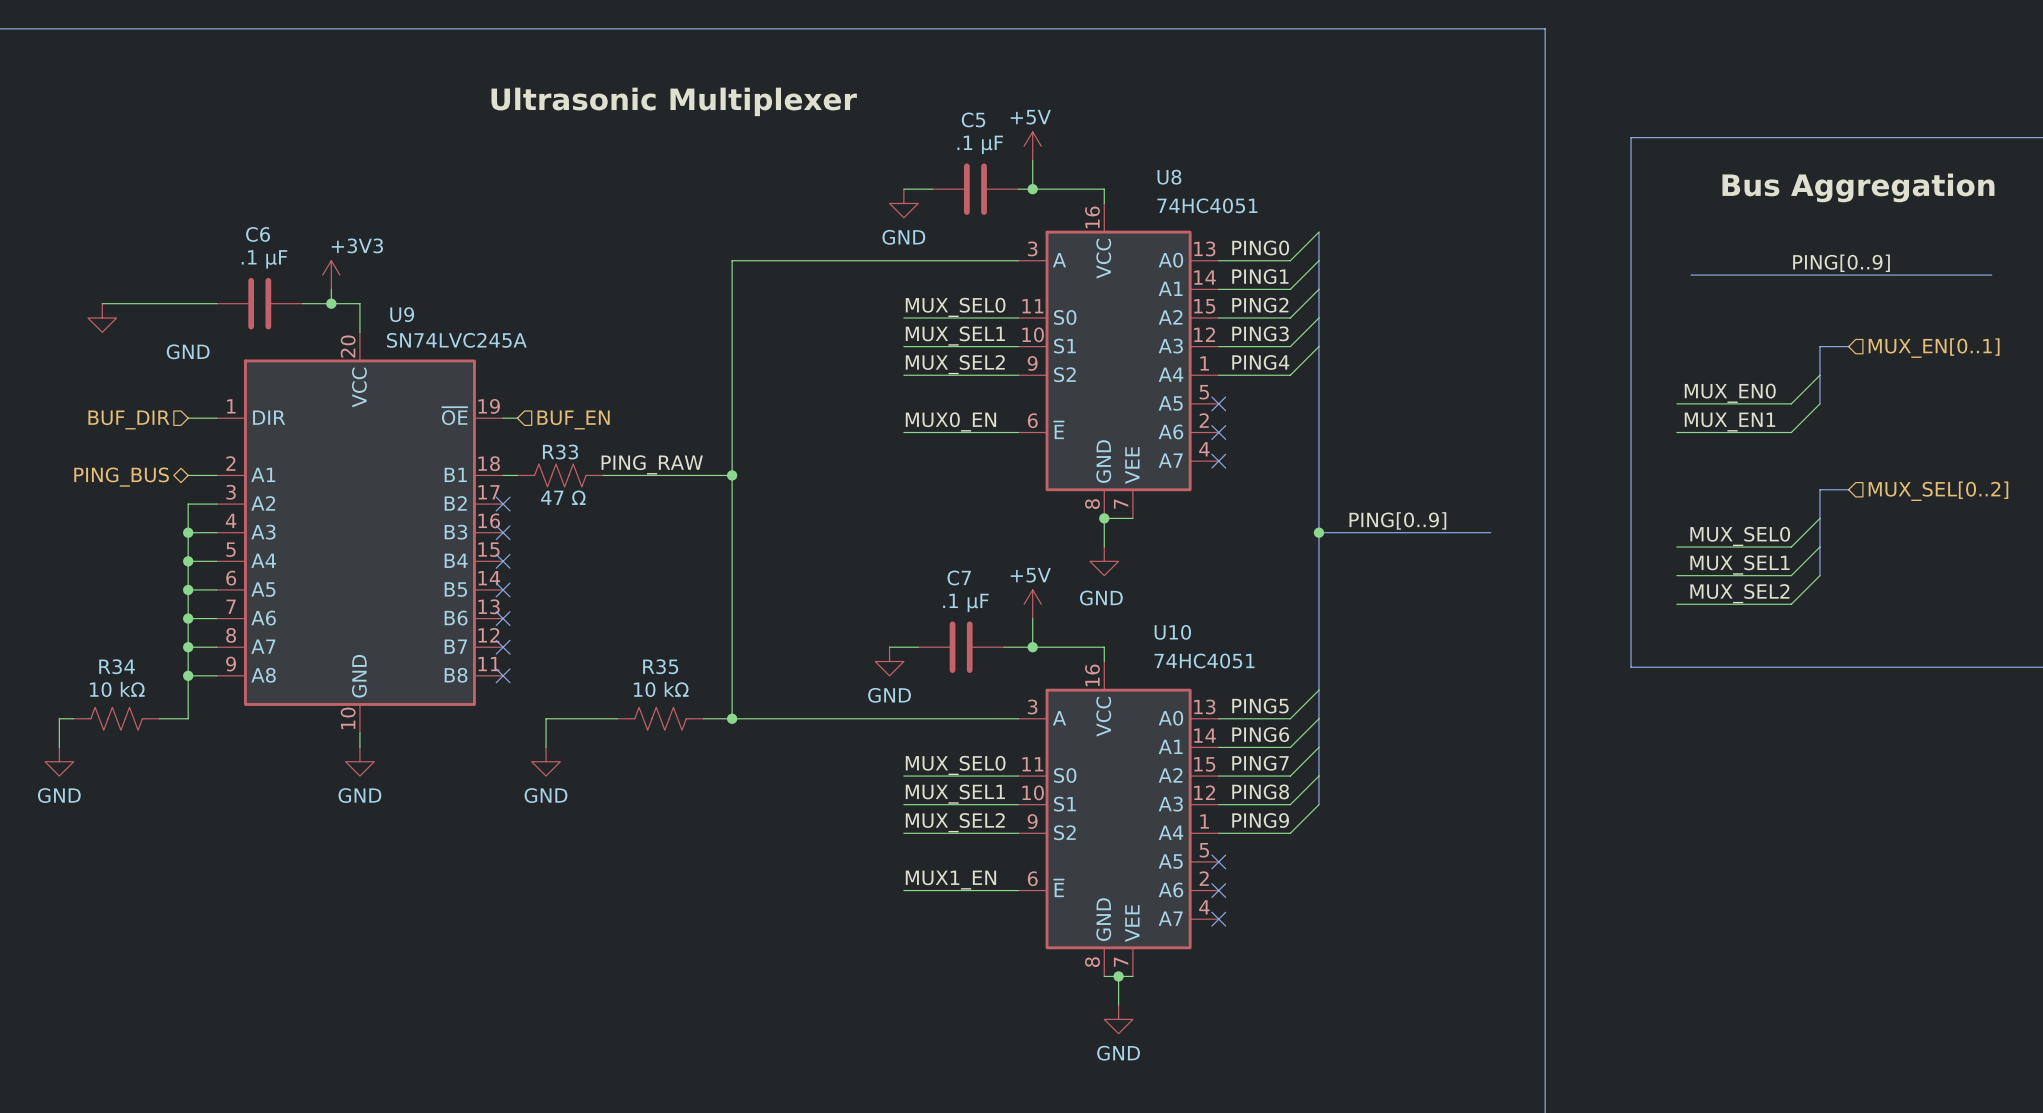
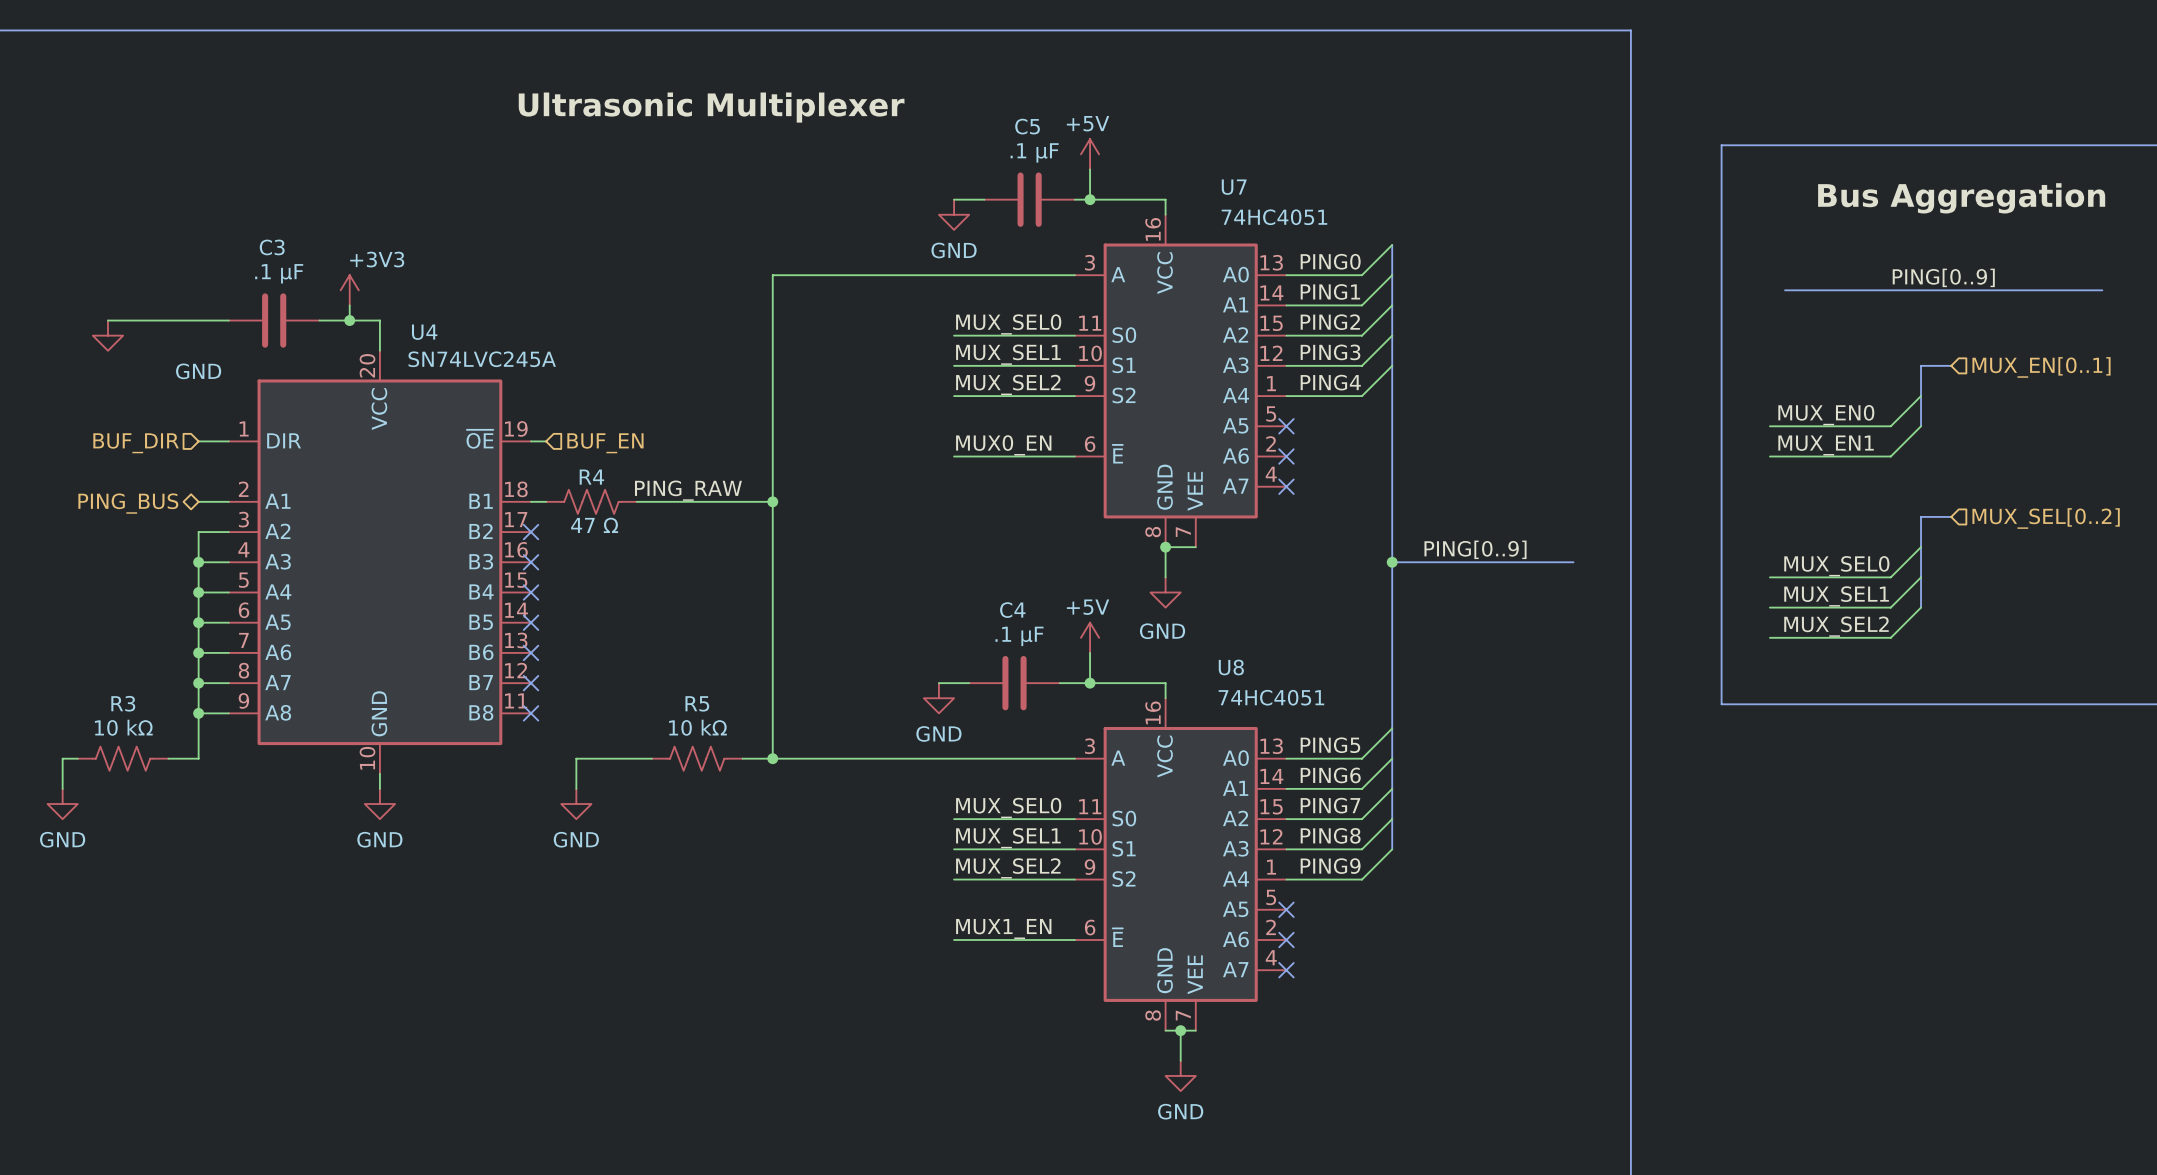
U8 name: U8 (1169, 177) -> U7 (1234, 187)
C6 name: C6 (258, 234) -> C3 (272, 247)
U9 name: U9 (402, 314) -> U4 (424, 332)
R33 name: R33 (560, 452) -> R4 (591, 477)
C7 name: C7 (959, 577) -> C4 (1012, 610)
U10 name: U10 (1172, 632) -> U8 (1231, 667)
R34 name: R34 (117, 666) -> R3 (123, 703)
R35 name: R35 (660, 666) -> R5 (697, 703)

